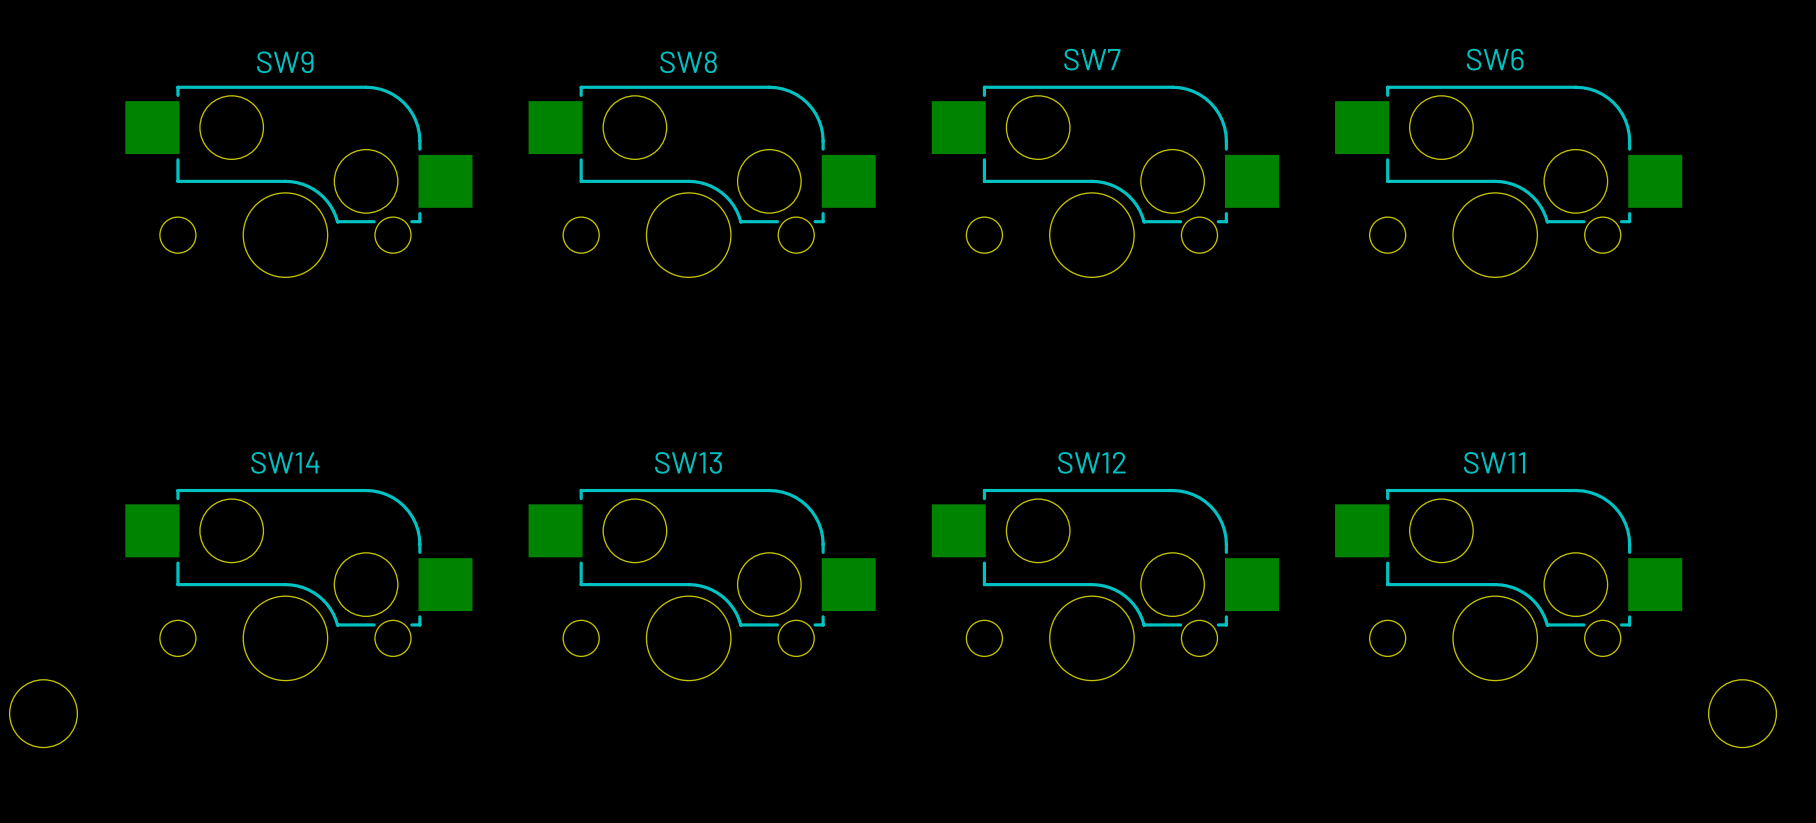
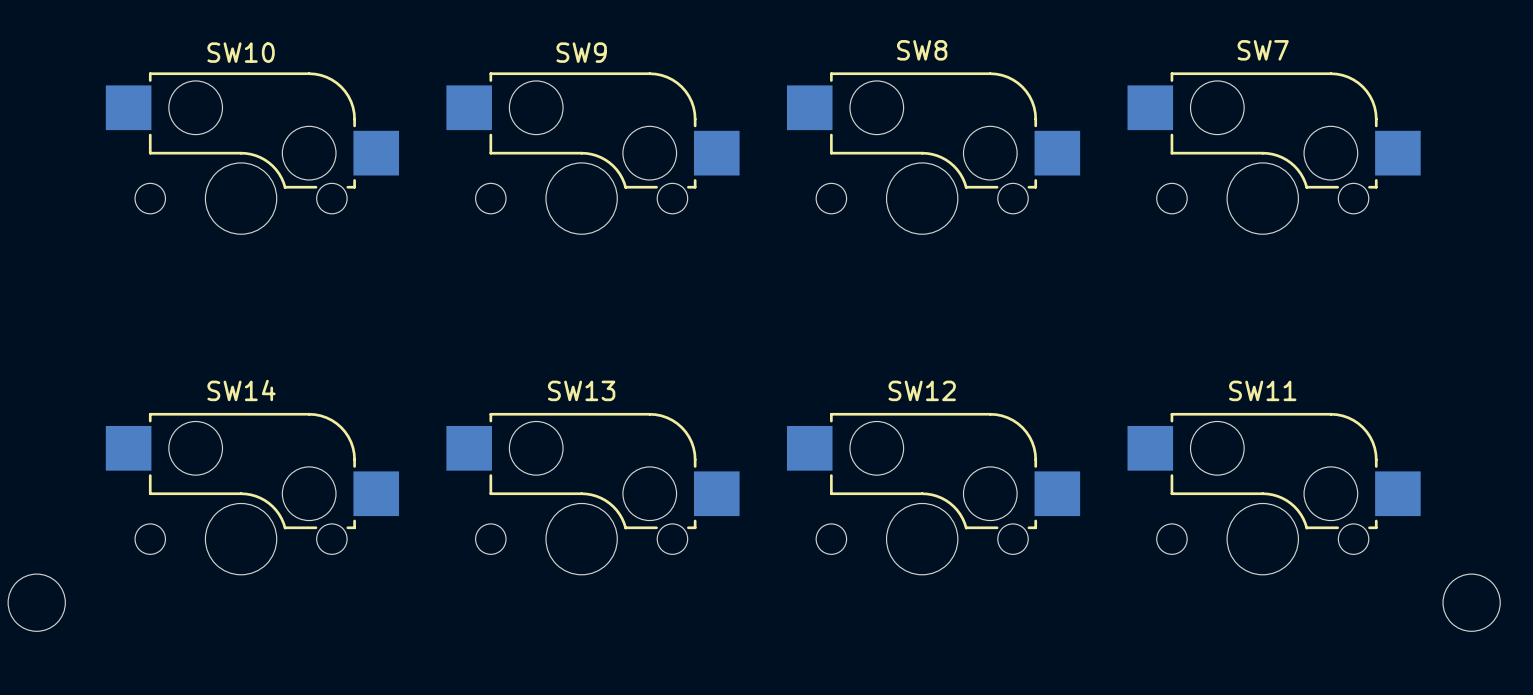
SW7 name: SW7 (1092, 59) -> SW8 (922, 50)
SW6 name: SW6 (1495, 59) -> SW7 (1263, 50)
SW9 name: SW9 (285, 62) -> SW10 (241, 52)
SW8 name: SW8 (688, 62) -> SW9 (581, 52)

